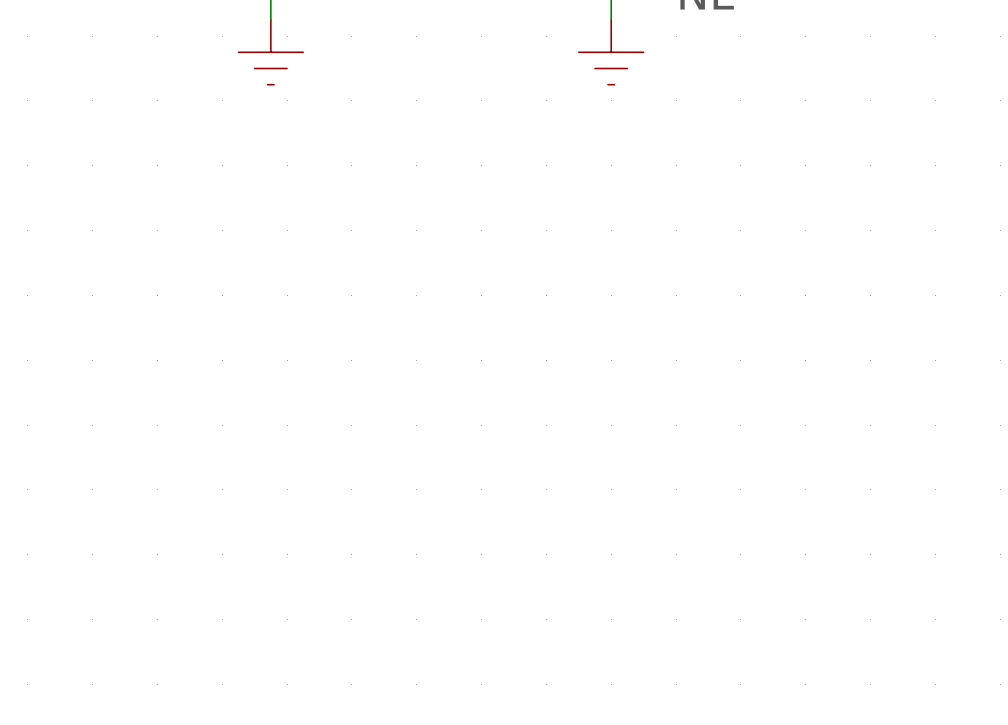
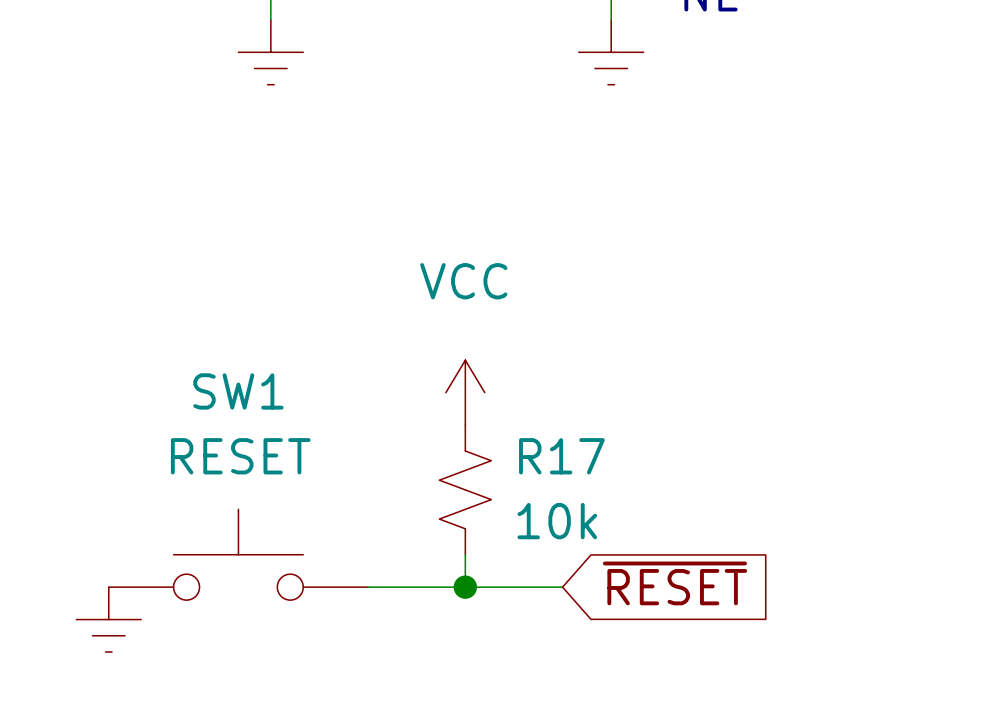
power symbol: none -> VCC (465, 392)
R17: none -> 10k (465, 489)
SW1: none -> RESET (238, 554)
wire: none -> (465, 554) (465, 587)
global label: none -> ~{RESET} (675, 583)
wire: none -> (368, 587) (562, 587)
junction: none -> (465, 587)
power symbol: none -> (108, 619)

